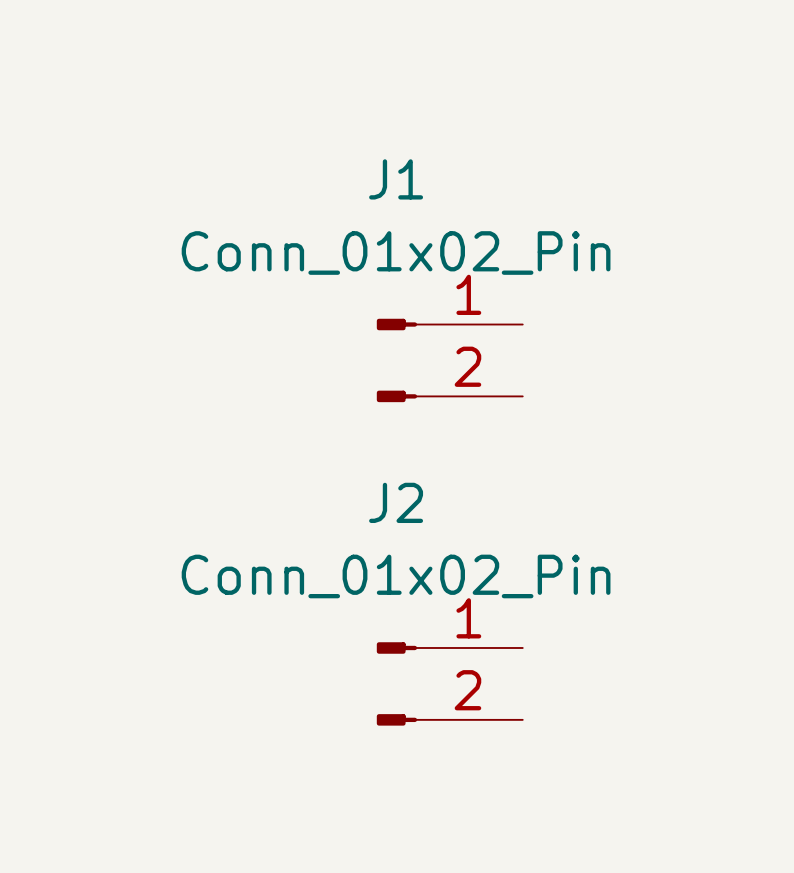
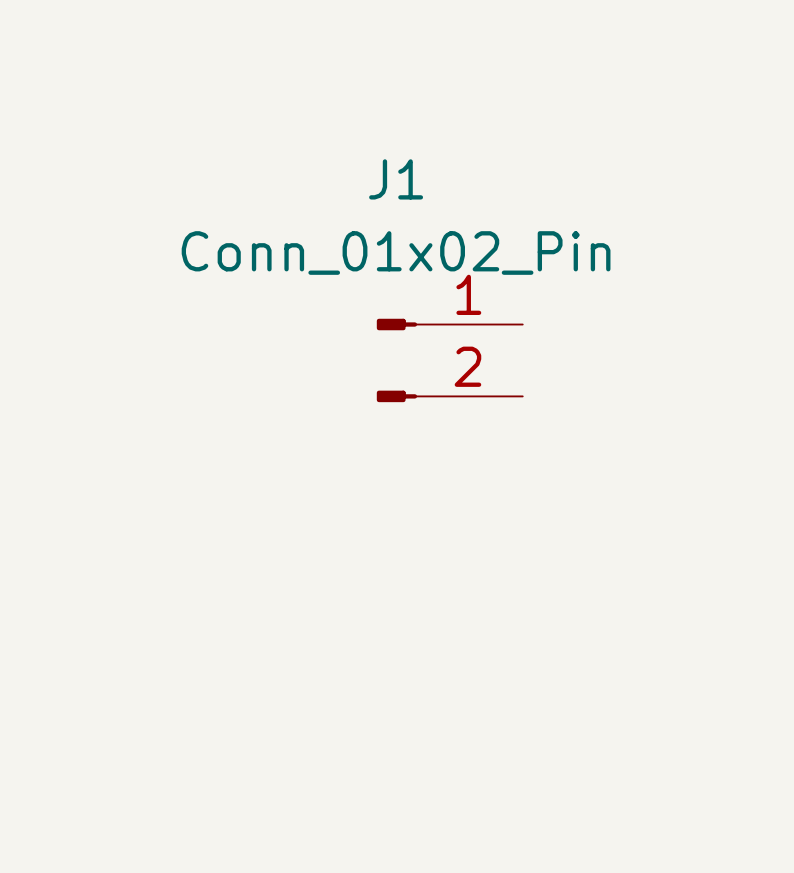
J2: Conn_01x02_Pin (449, 683) -> none

